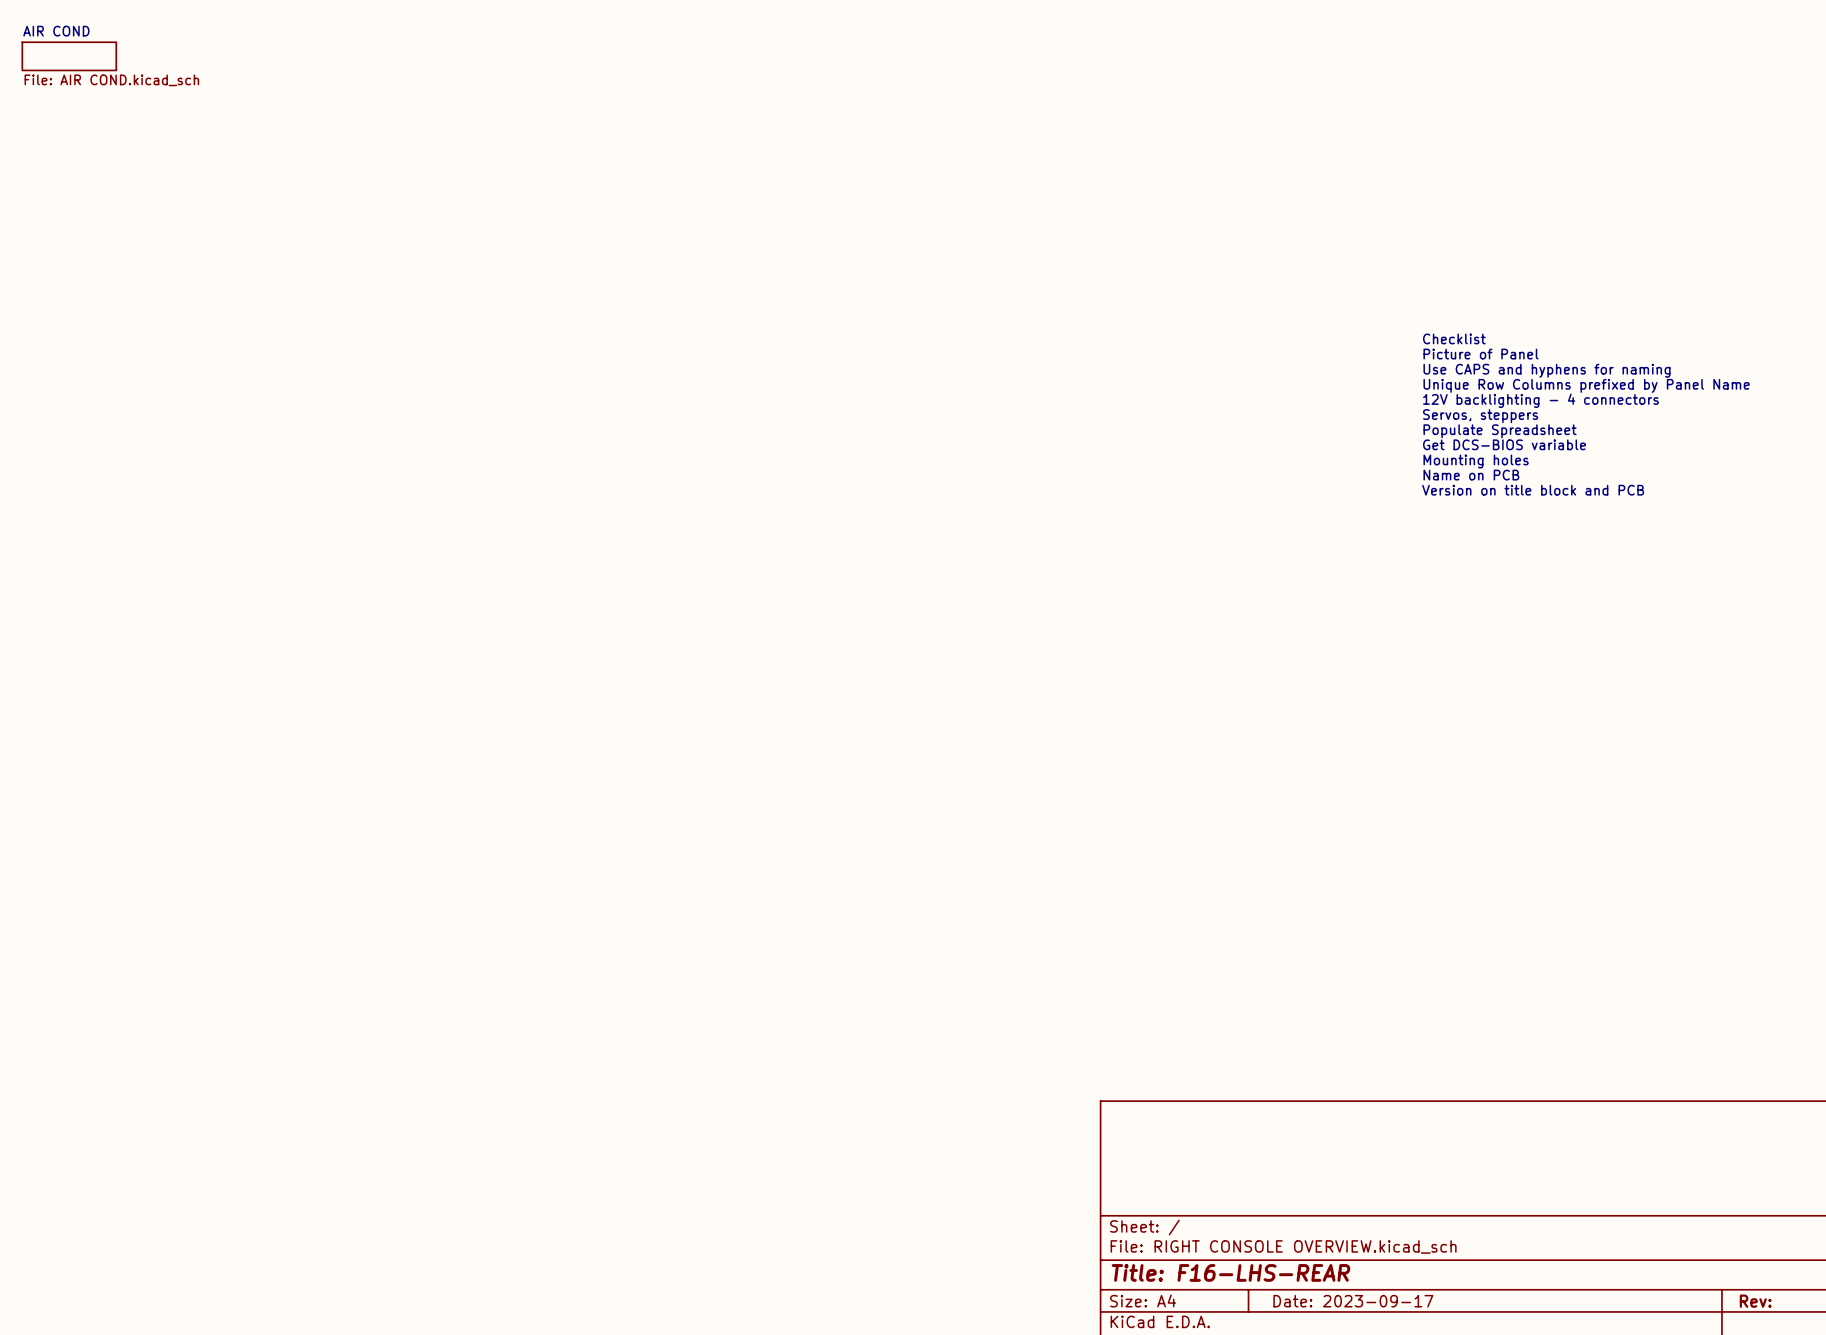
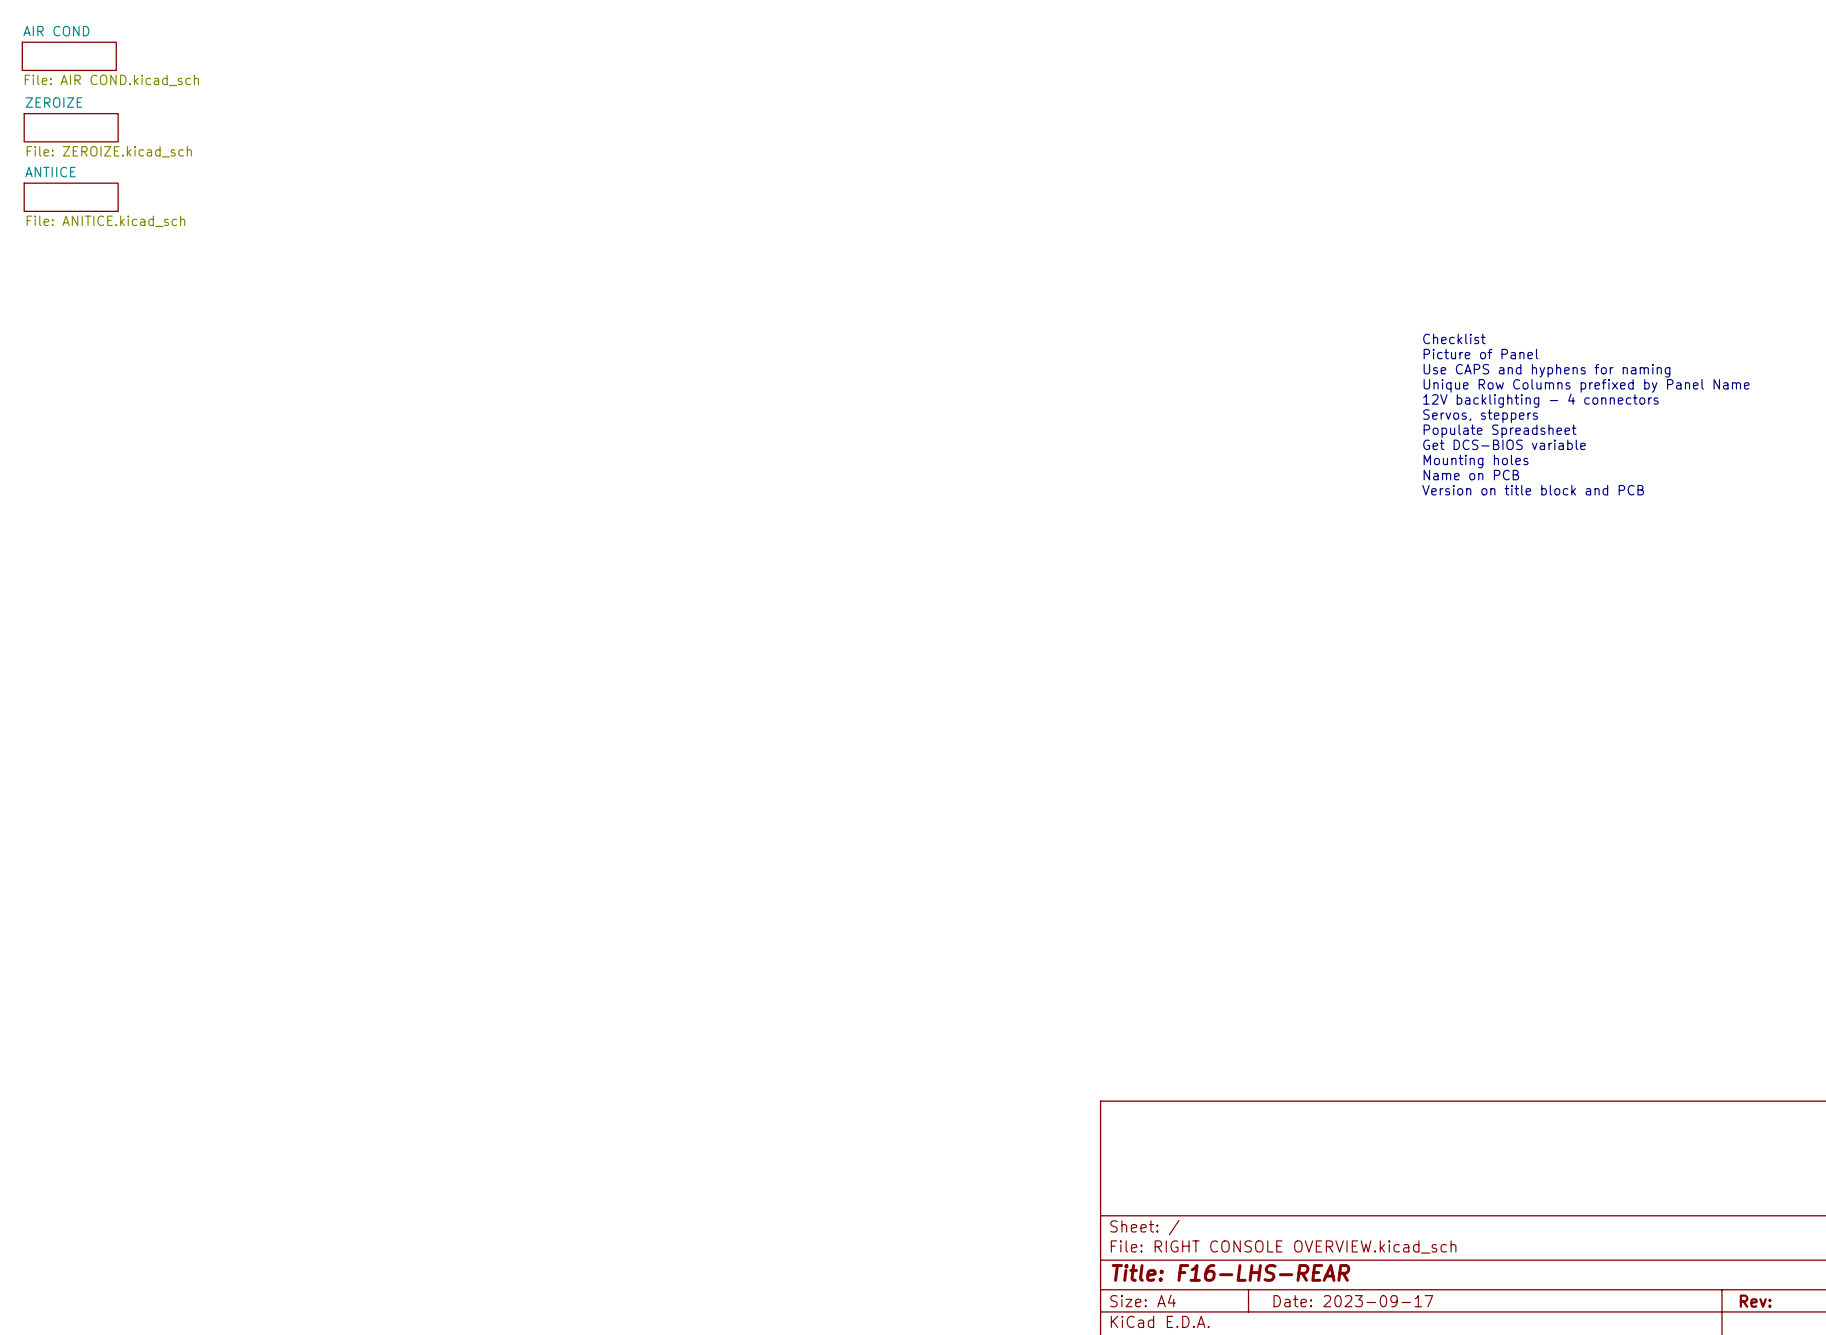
sheet ZEROIZE: none -> File: ZEROIZE.kicad_sch (71, 127)
sheet ANTIICE: none -> File: ANITICE.kicad_sch (71, 197)

